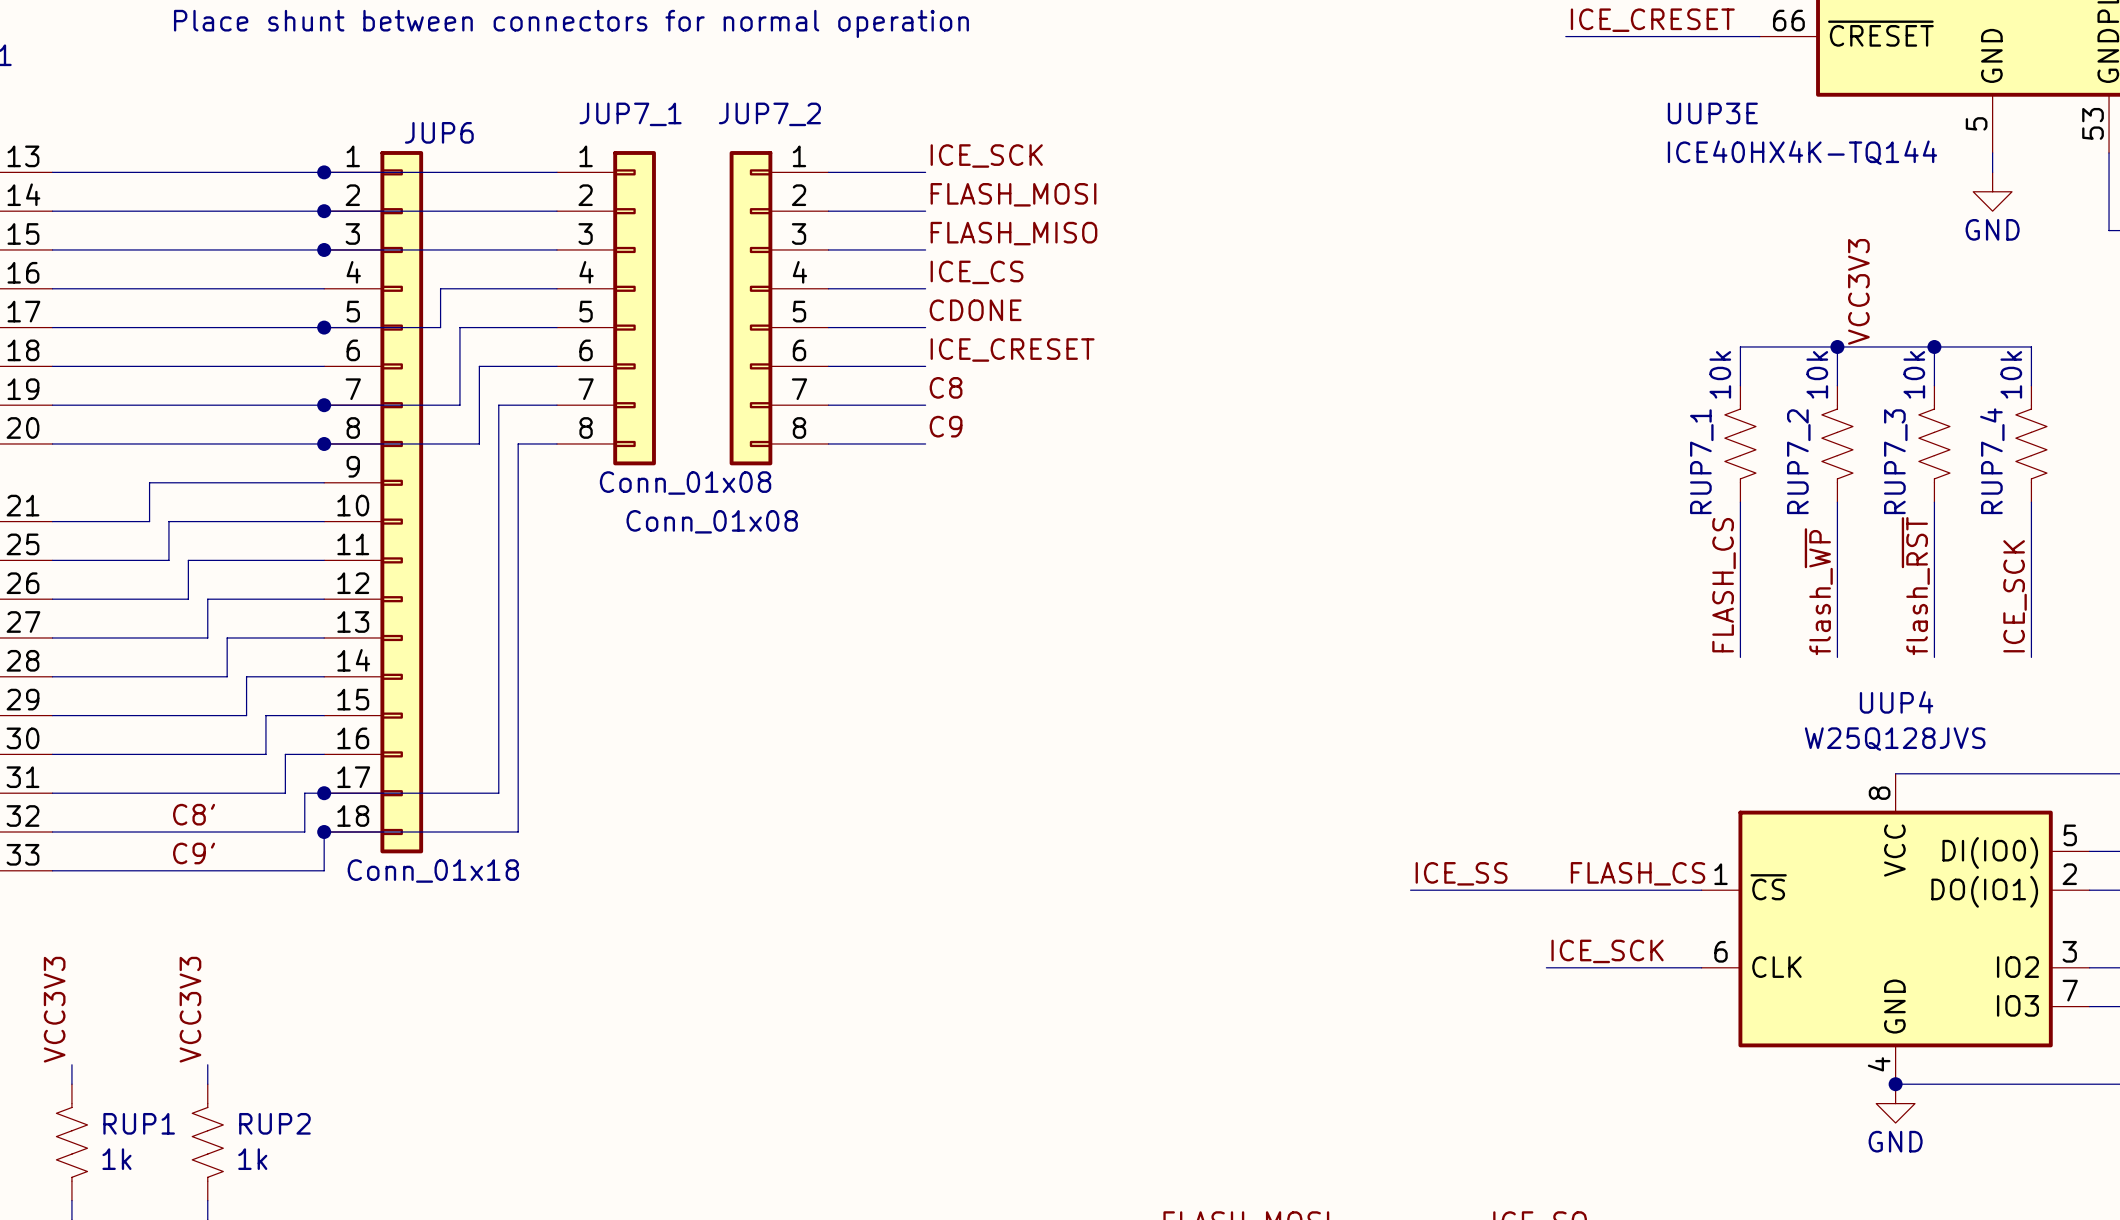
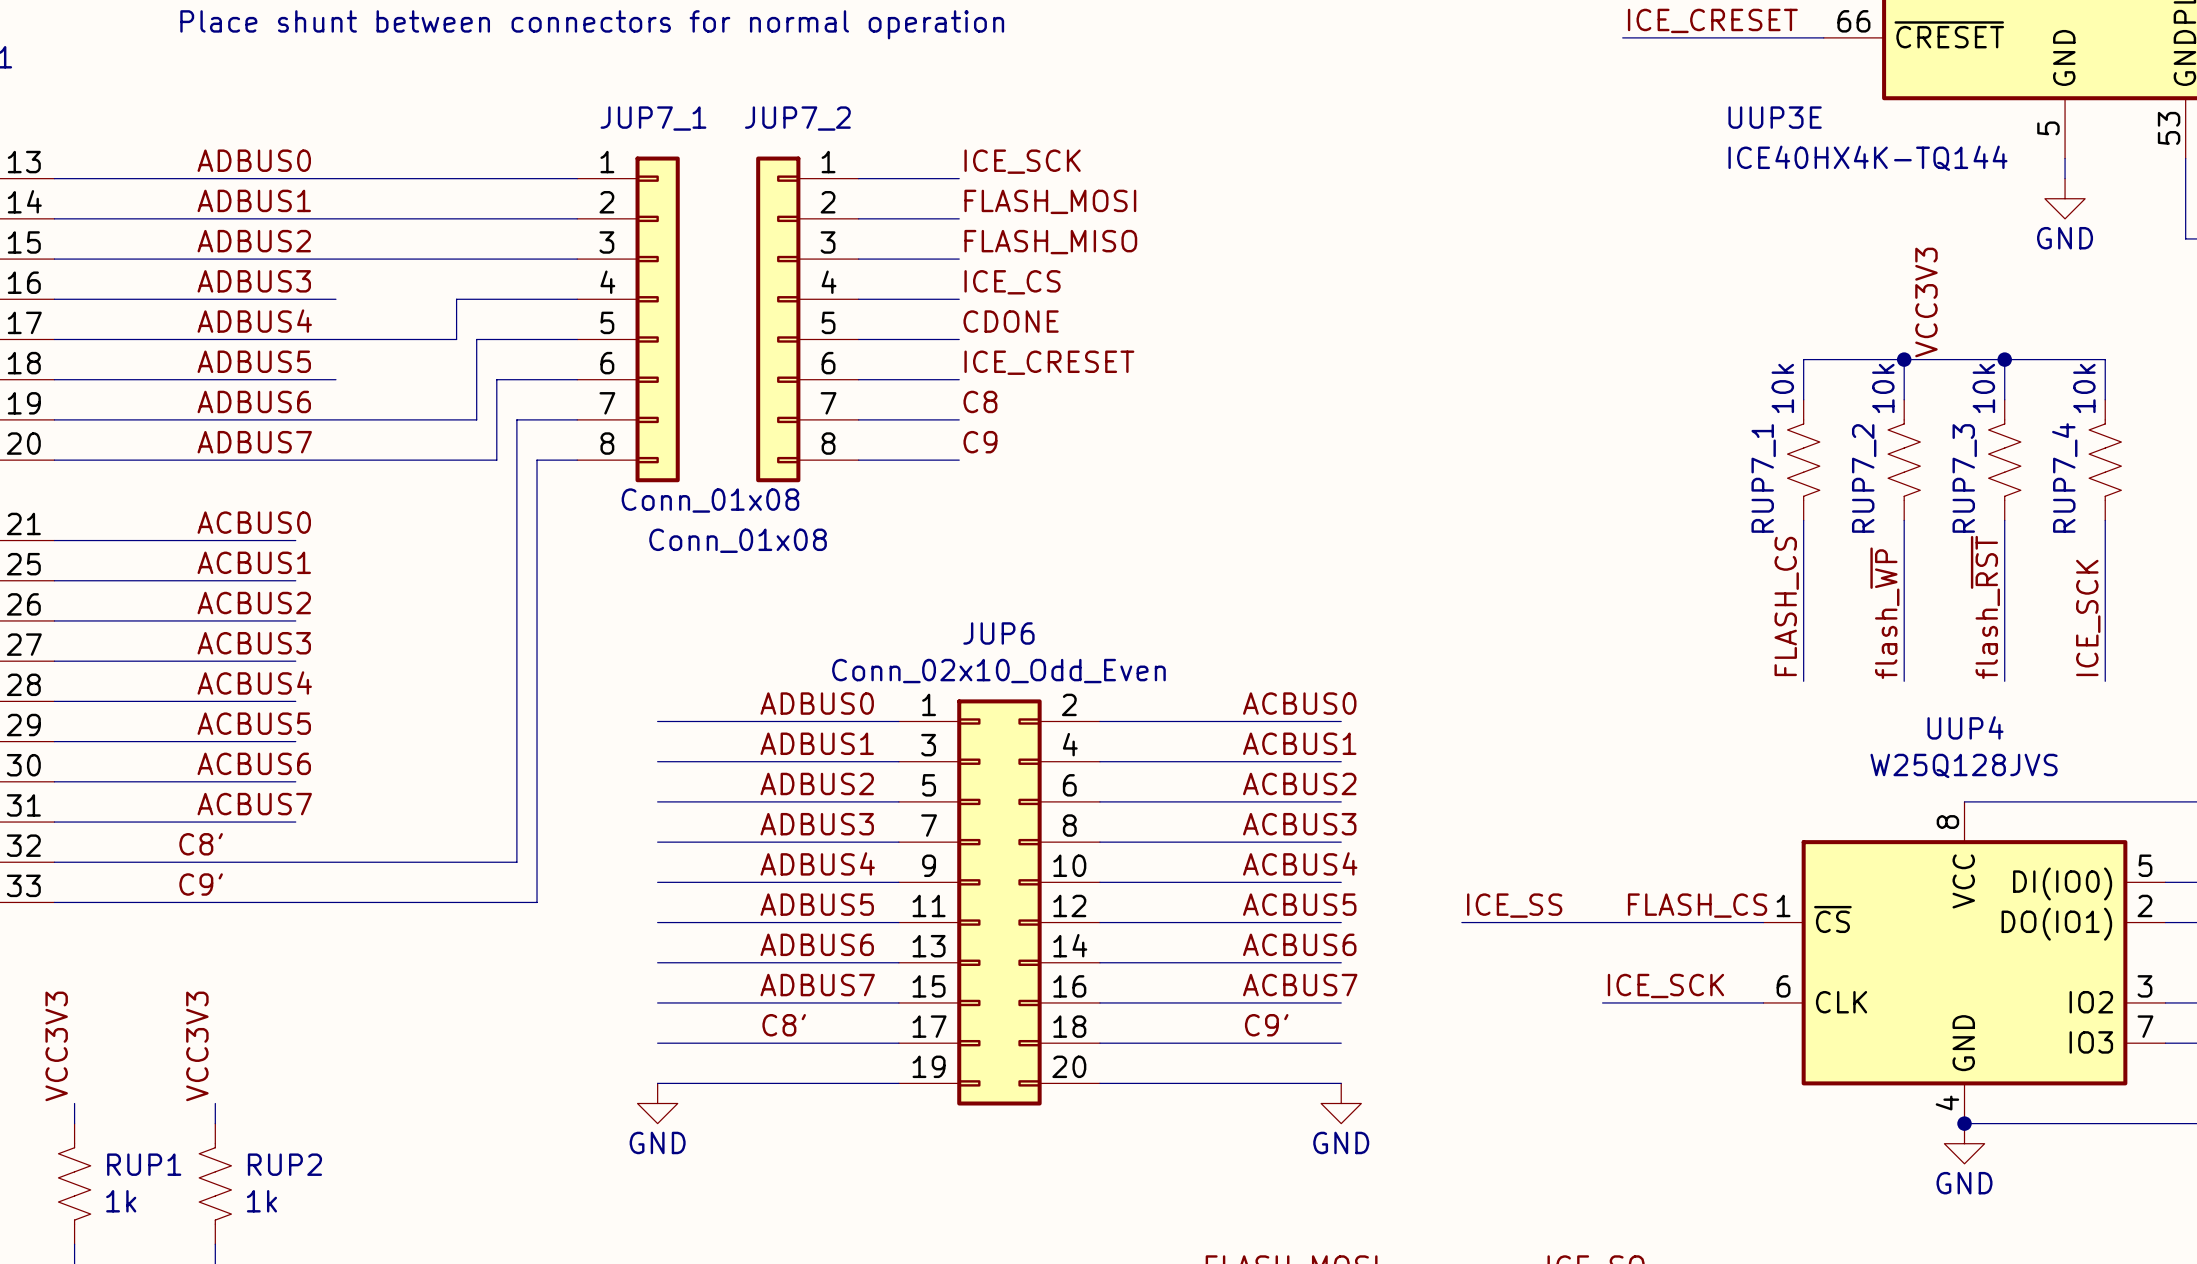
JUP6 name position: JUP6 (439, 132) -> JUP6 (998, 633)
JUP6 symbol: [324, 151, 424, 854] -> [898, 699, 1100, 1106]
label: none -> ADBUS0 (254, 160)
junction: (324, 172) -> none
label: none -> ADBUS1 (254, 200)
junction: (324, 211) -> none
label: none -> ADBUS2 (254, 241)
junction: (324, 249) -> none
label: none -> ADBUS3 (254, 281)
label: none -> ADBUS4 (254, 321)
junction: (324, 327) -> none
label: none -> ADBUS5 (254, 361)
label: none -> ADBUS6 (254, 401)
junction: (324, 405) -> none
label: none -> ADBUS7 (254, 442)
junction: (324, 443) -> none
wire: (324, 482) (149, 482) (149, 521) -> none
label: none -> ACBUS0 (254, 522)
wire: (168, 521) (168, 560) -> (175, 540) (155, 540)
wire: (285, 521) (324, 521) -> none
label: none -> ACBUS1 (254, 562)
wire: (188, 560) (188, 599) -> (195, 580) (175, 580)
wire: (285, 560) (324, 560) -> none
label: none -> ACBUS2 (254, 603)
wire: (207, 599) (207, 637) -> (215, 620) (195, 620)
wire: (285, 599) (324, 599) -> none
label: none -> ACBUS3 (254, 643)
wire: (227, 637) (227, 676) -> (235, 661) (215, 661)
wire: (285, 637) (324, 637) -> none
label: none -> ACBUS4 (254, 682)
wire: (246, 676) (246, 715) -> (255, 701) (235, 701)
wire: (285, 676) (324, 676) -> none
label: none -> ADBUS0 (817, 703)
label: none -> ACBUS0 (1299, 703)
wire: none -> (657, 721) (898, 721)
wire: none -> (1099, 721) (1341, 721)
label: none -> ACBUS5 (254, 723)
wire: none -> (255, 741) (275, 741)
wire: (265, 715) (265, 754) -> (295, 781) (275, 781)
wire: (285, 715) (324, 715) -> none
label: none -> ADBUS1 (817, 743)
label: none -> ACBUS1 (1299, 743)
wire: none -> (657, 761) (898, 761)
wire: none -> (1099, 761) (1341, 761)
label: none -> ACBUS6 (254, 763)
wire: (324, 754) (285, 754) (285, 793) -> none
label: none -> ADBUS2 (817, 783)
label: none -> ACBUS2 (1299, 783)
wire: none -> (657, 801) (898, 801)
wire: none -> (1099, 801) (1341, 801)
label: none -> ACBUS7 (254, 804)
junction: (324, 793) -> none
wire: (498, 793) (304, 793) (304, 832) -> none
label: none -> ADBUS3 (817, 824)
label: none -> ACBUS3 (1299, 824)
wire: none -> (657, 842) (898, 842)
wire: none -> (1099, 842) (1341, 842)
wire: (324, 832) (324, 870) -> (335, 862) (315, 862)
junction: (324, 832) -> none
wire: (498, 832) (518, 832) -> (516, 862) (516, 822)
wire: none -> (537, 862) (537, 902) (335, 902)
label: none -> ADBUS4 (817, 863)
label: none -> ACBUS4 (1300, 863)
wire: none -> (657, 882) (898, 882)
wire: none -> (1099, 882) (1341, 882)
JUP6 value: Conn_01x18 (433, 871) -> Conn_02x10_Odd_Even (998, 671)
label: none -> ADBUS5 (817, 904)
label: none -> ACBUS5 (1299, 904)
wire: none -> (657, 922) (898, 922)
wire: none -> (1099, 922) (1341, 922)
label: none -> ADBUS6 (817, 944)
label: none -> ACBUS6 (1299, 944)
wire: none -> (657, 962) (898, 962)
wire: none -> (1099, 962) (1341, 962)
label: none -> ADBUS7 (817, 985)
label: none -> ACBUS7 (1300, 985)
wire: none -> (657, 1002) (898, 1002)
wire: none -> (1099, 1002) (1341, 1002)
label: none -> C8' (784, 1025)
label: none -> C9' (1266, 1025)
wire: none -> (657, 1043) (898, 1043)
wire: none -> (1099, 1043) (1341, 1043)
wire: none -> (657, 1083) (898, 1083)
wire: none -> (1099, 1083) (1341, 1083)
power symbol: none -> GND (657, 1103)
power symbol: none -> GND (1341, 1103)

